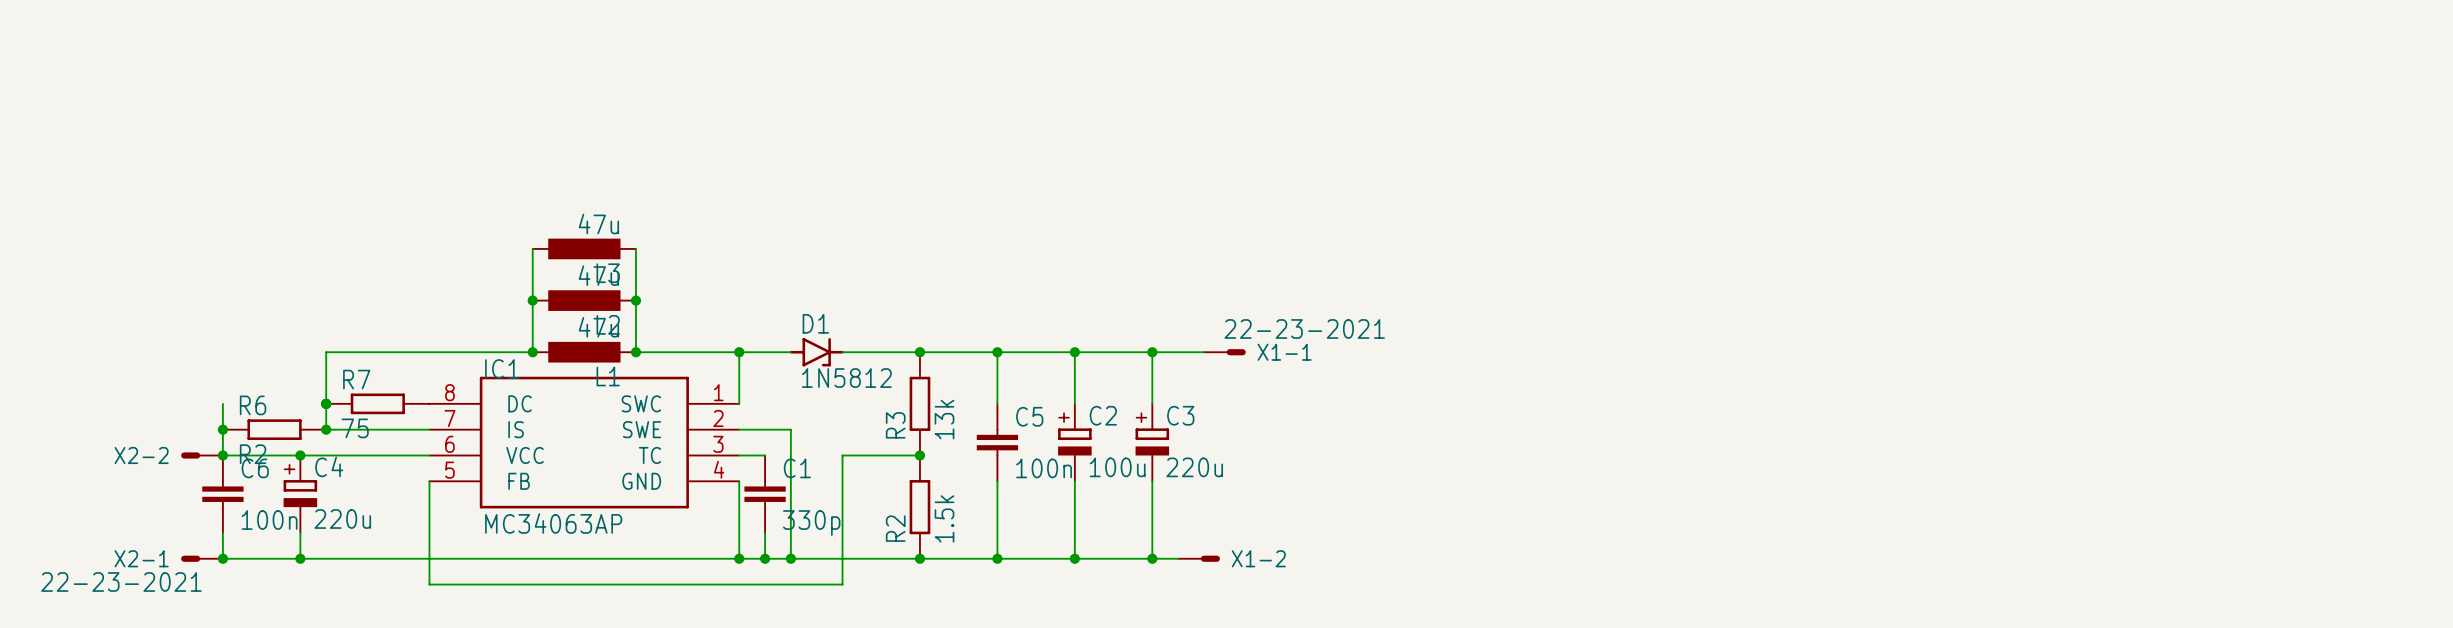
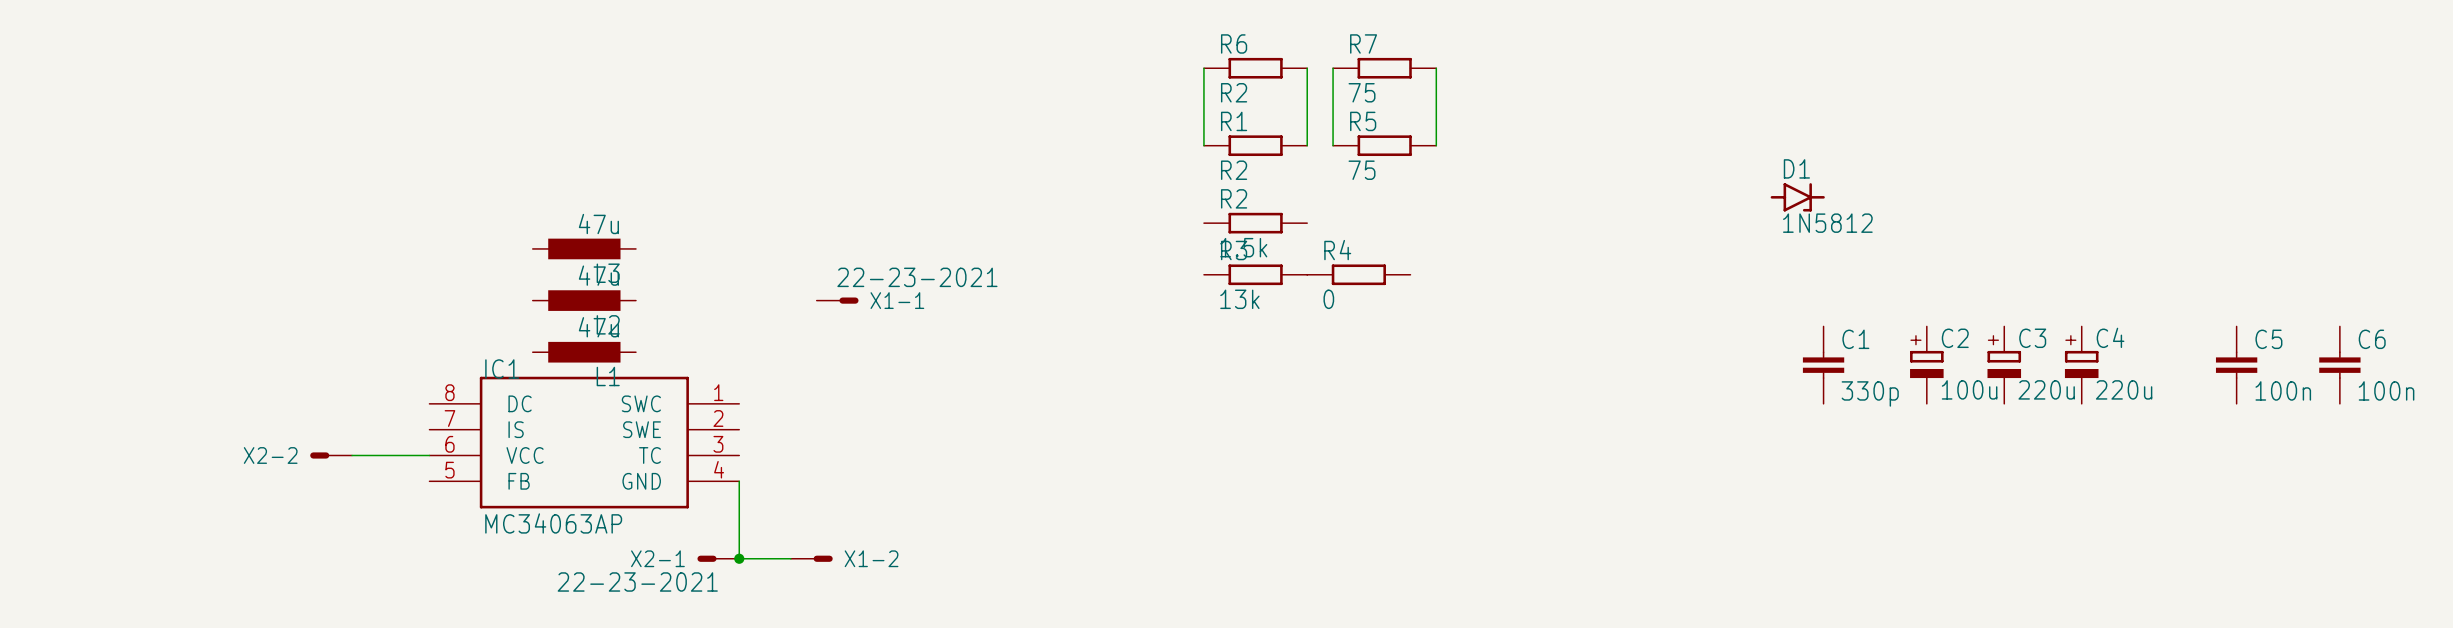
wire: none -> (1203, 68) (1203, 145)
wire: none -> (1307, 68) (1307, 145)
wire: none -> (1333, 68) (1333, 145)
wire: none -> (1436, 68) (1436, 145)
R1: none -> R2 (1255, 145)
R5: none -> 75 (1384, 145)
wire: (532, 248) (532, 352) (326, 352) (326, 429) (429, 429) -> none
wire: (635, 248) (635, 352) (790, 352) -> none
R4: none -> 0 (1358, 274)
junction: (532, 300) -> none
junction: (635, 300) -> none
junction: (532, 352) -> none
junction: (635, 352) -> none
wire: (739, 352) (739, 403) -> none
junction: (739, 352) -> none
D1 position: (816, 352) -> (1797, 197)
wire: (842, 352) (1203, 352) -> none
junction: (919, 352) -> none
wire: (997, 352) (997, 403) -> none
junction: (997, 352) -> none
wire: (1074, 352) (1074, 403) -> none
junction: (1074, 352) -> none
wire: (1152, 352) (1152, 403) -> none
junction: (1152, 352) -> none
X1-1 position: (1224, 352) -> (837, 300)
wire: (222, 403) (222, 455) (352, 455) -> none
junction: (326, 403) -> none
R7 position: (377, 403) -> (1384, 68)
R3 rotation: 0° (919, 403) -> 90° clockwise (1255, 274)
R3 position: (919, 403) -> (1255, 274)
junction: (222, 429) -> none
R6 position: (274, 429) -> (1255, 68)
junction: (326, 429) -> none
wire: (739, 429) (790, 429) (790, 558) (1178, 558) -> none
C5 position: (997, 442) -> (2236, 365)
C2 position: (1074, 442) -> (1926, 365)
C3 position: (1152, 442) -> (2004, 365)
X2-2 position: (202, 455) -> (331, 455)
junction: (222, 455) -> none
junction: (300, 455) -> none
wire: (739, 455) (765, 455) -> none
wire: (919, 455) (842, 455) (842, 584) (429, 584) (429, 481) -> none
junction: (919, 455) -> none
wire: (997, 481) (997, 558) -> none
wire: (1074, 481) (1074, 558) -> none
wire: (1152, 481) (1152, 558) -> none
C6 position: (222, 494) -> (2339, 365)
C4 position: (300, 494) -> (2081, 365)
C1 position: (765, 494) -> (1823, 365)
R2 rotation: 0° (919, 507) -> 90° clockwise (1255, 223)
R2 position: (919, 507) -> (1255, 223)
wire: (222, 532) (222, 558) (739, 558) -> none
wire: (300, 532) (300, 558) -> none
wire: (765, 532) (765, 558) -> none
X2-1 position: (202, 558) -> (718, 558)
junction: (222, 558) -> none
junction: (300, 558) -> none
junction: (765, 558) -> none
junction: (790, 558) -> none
junction: (919, 558) -> none
junction: (997, 558) -> none
junction: (1074, 558) -> none
junction: (1152, 558) -> none
X1-2 position: (1199, 558) -> (811, 558)

